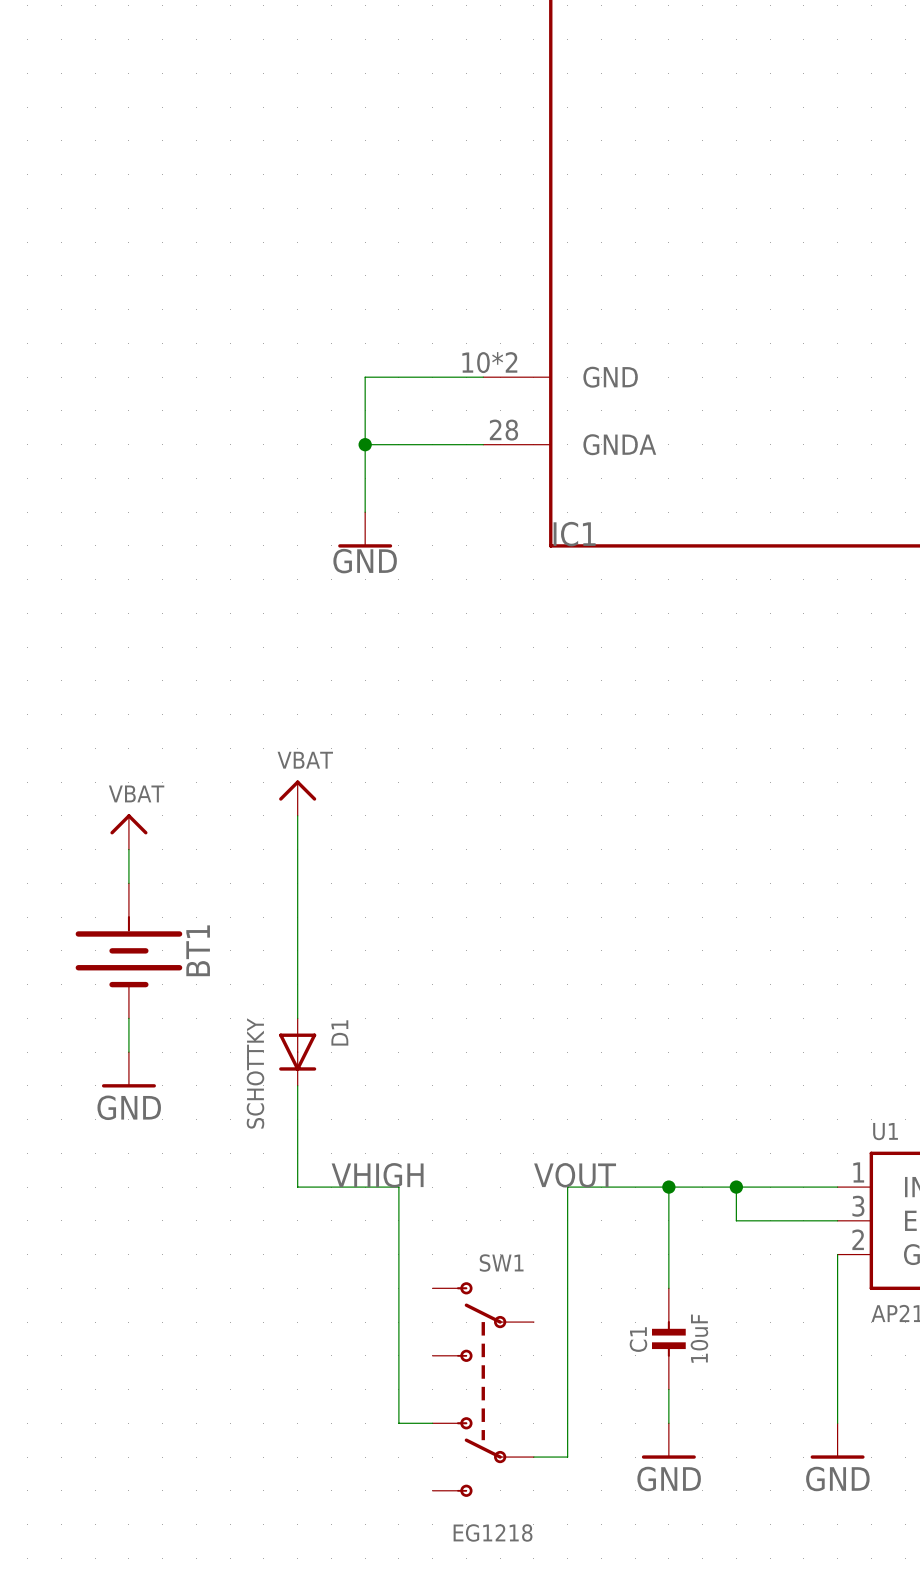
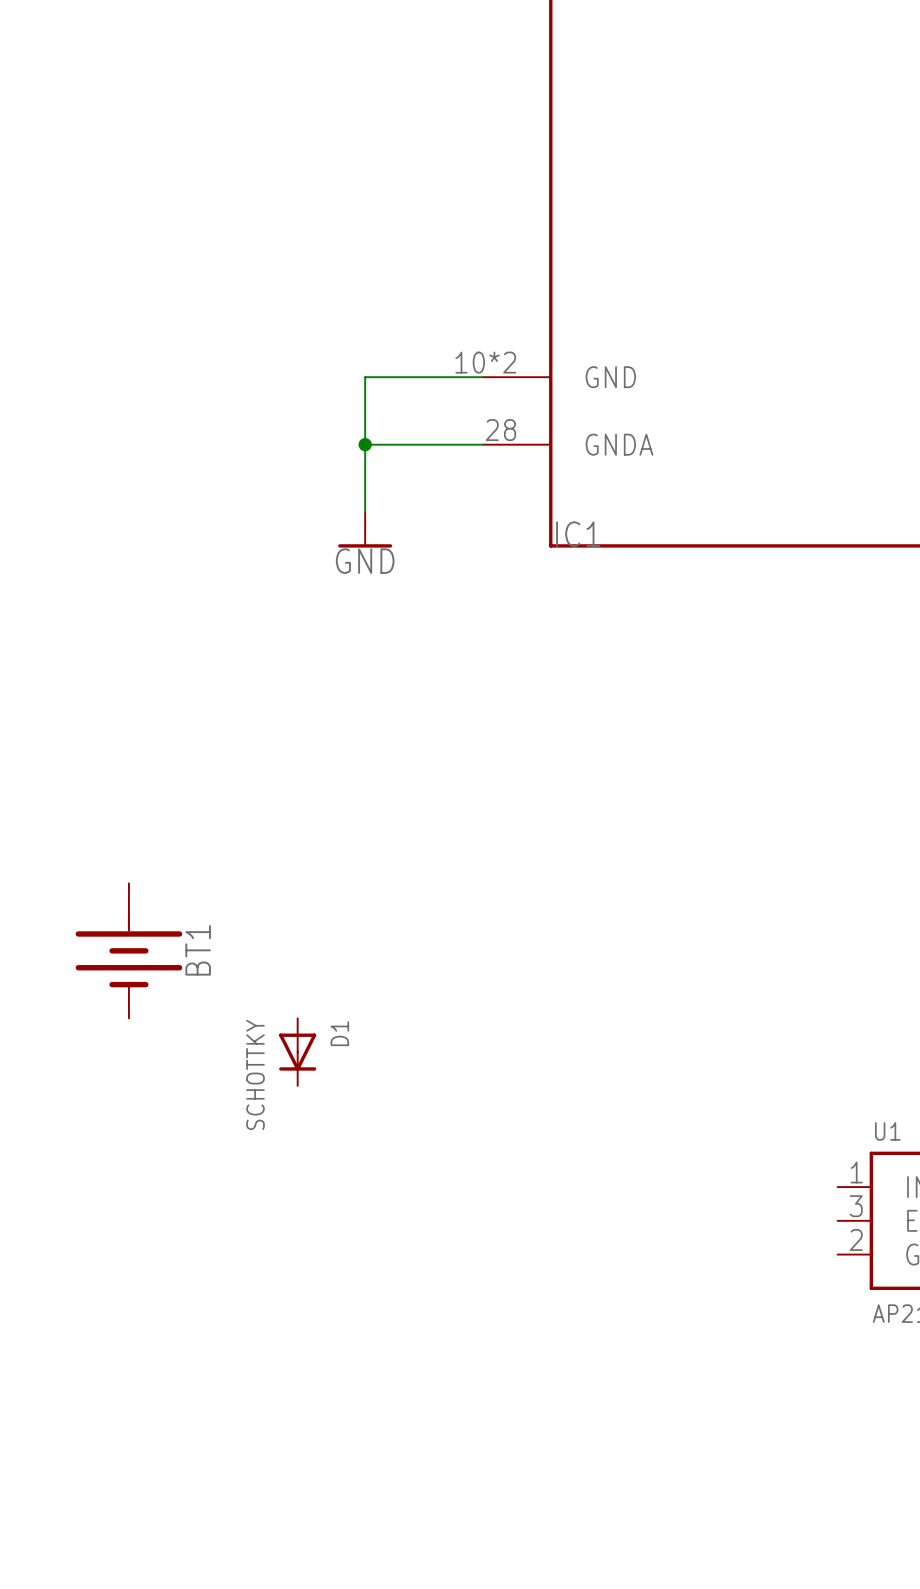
power symbol: VBAT (297, 798) -> none
wire: (297, 815) (297, 1018) -> none
power symbol: VBAT (128, 831) -> none
wire: (128, 849) (128, 883) -> none
wire: (128, 1018) (128, 1052) -> none
power symbol: GND (128, 1069) -> none
wire: (297, 1085) (297, 1187) (398, 1187) (398, 1423) (432, 1423) -> none
label: VHIGH (377, 1175) -> none
label: VOUT (575, 1175) -> none
wire: (668, 1187) (668, 1288) -> none
junction: (668, 1187) -> none
wire: (736, 1187) (736, 1220) (837, 1220) -> none
junction: (736, 1187) -> none
wire: (837, 1187) (567, 1187) (567, 1457) (533, 1457) -> none
wire: (837, 1254) (837, 1423) -> none
C1: 10uF (668, 1338) -> none
SW1: EG1218 (483, 1389) -> none
wire: (668, 1389) (668, 1423) -> none
power symbol: GND (668, 1441) -> none
power symbol: GND (837, 1441) -> none

